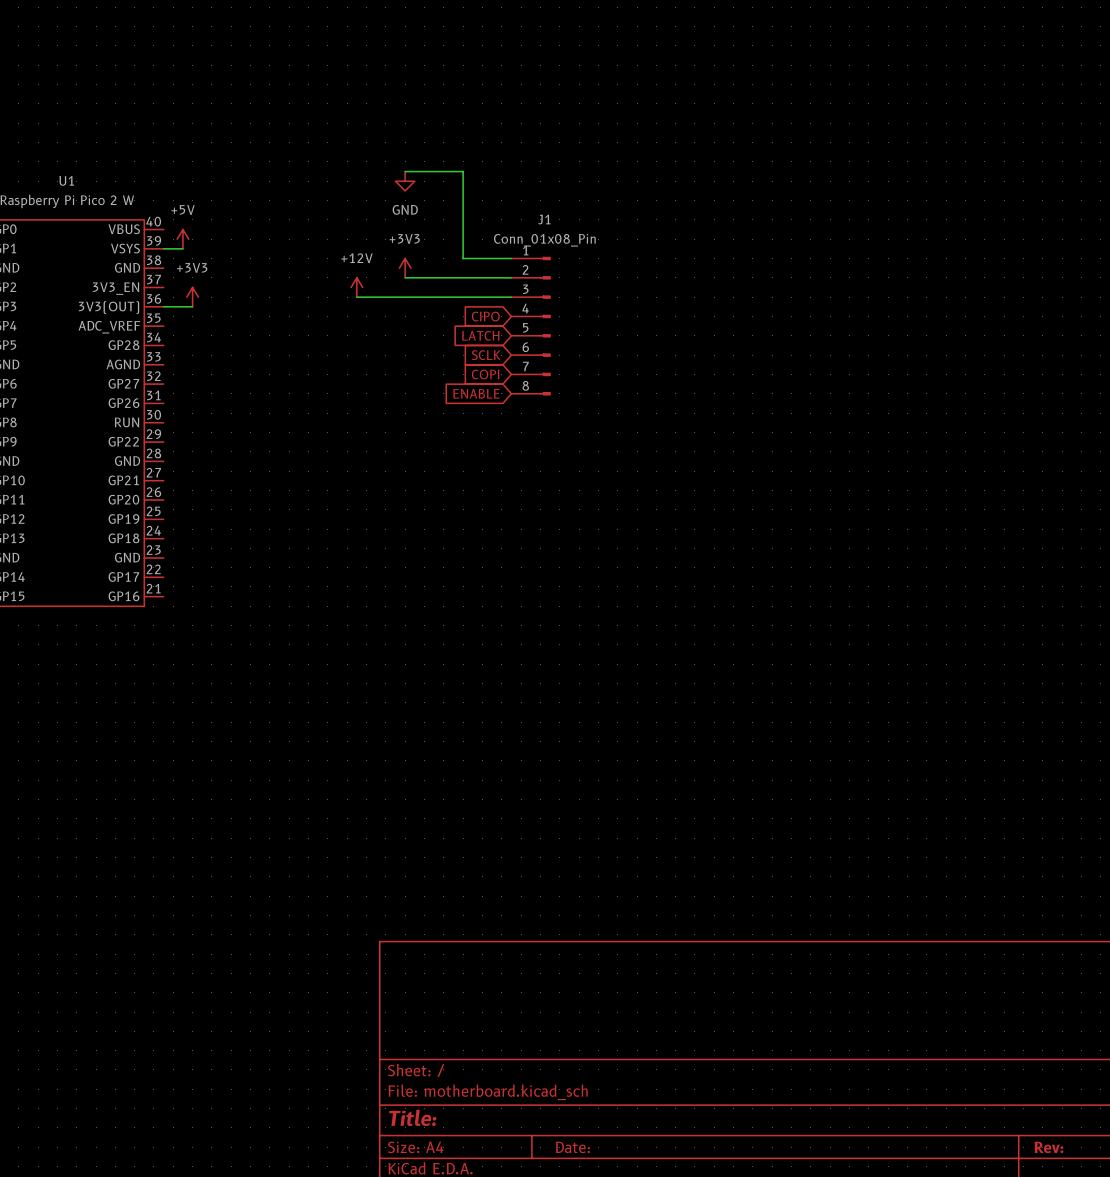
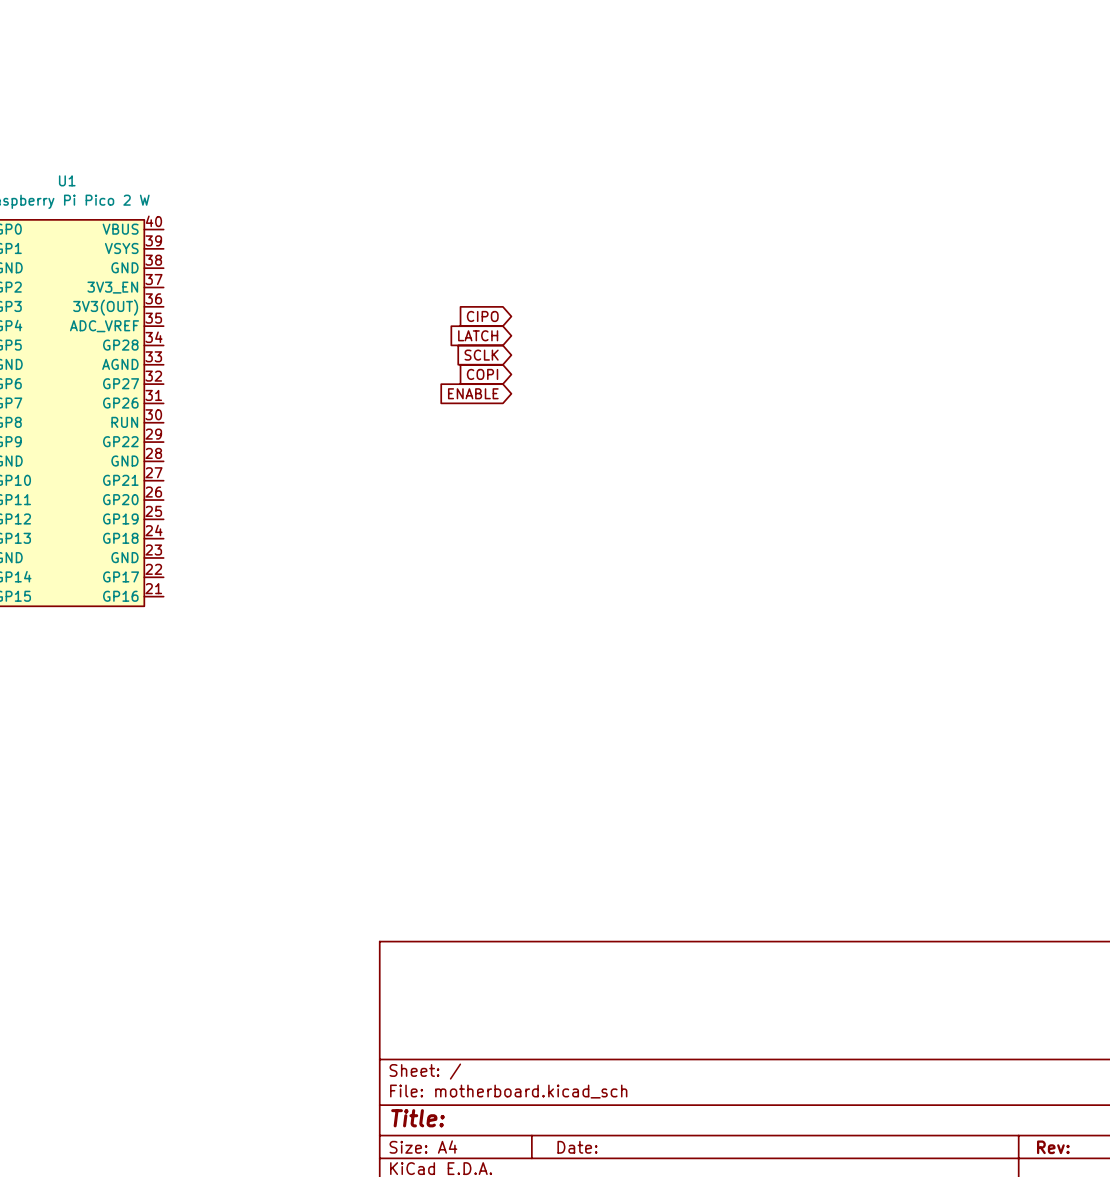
wire: (405, 171) (463, 171) (463, 258) (511, 258) -> none
power symbol: GND (405, 181) -> none
power symbol: +5V (182, 239) -> none
wire: (163, 248) (182, 248) -> none
power symbol: +3V3 (405, 268) -> none
wire: (405, 277) (511, 277) -> none
power symbol: +12V (356, 287) -> none
power symbol: +3V3 (192, 297) -> none
wire: (356, 297) (511, 297) -> none
wire: (163, 306) (192, 306) -> none
J1: Conn_01x08_Pin (531, 326) -> none

